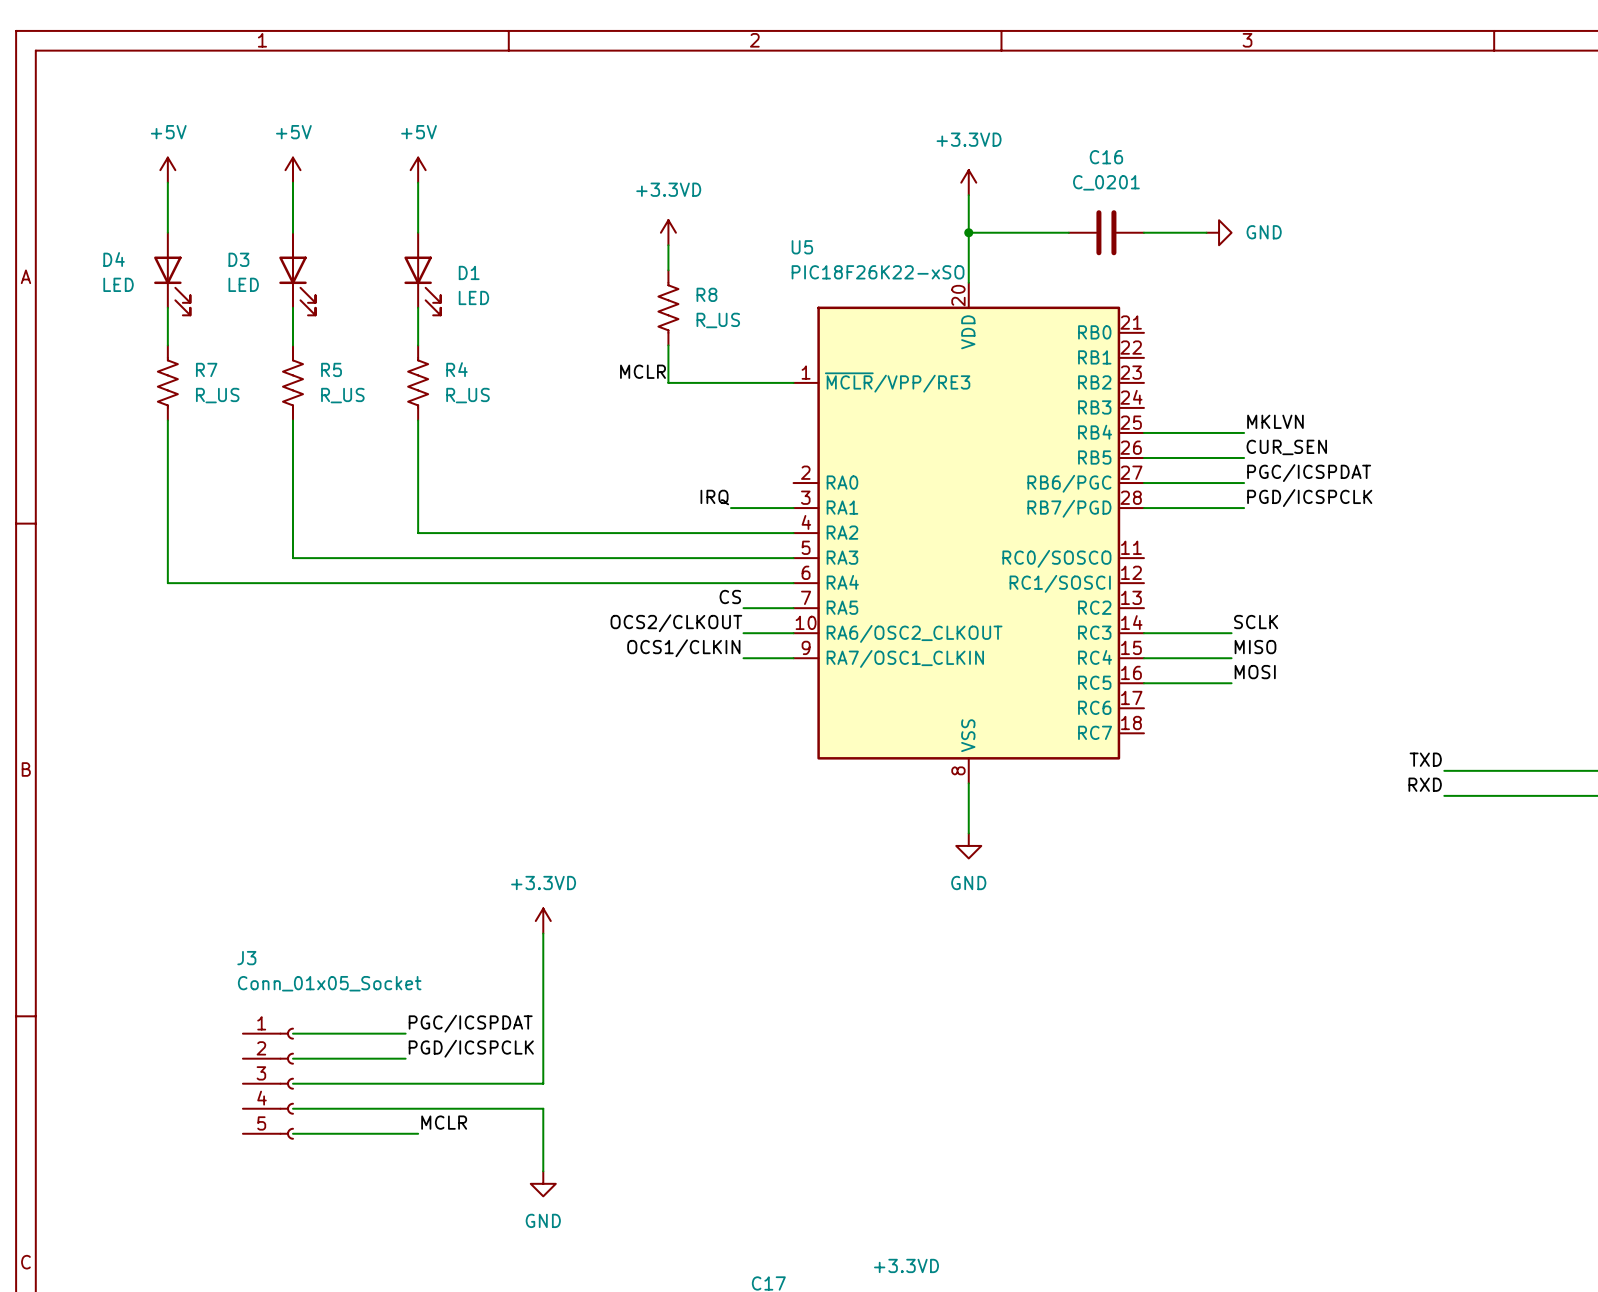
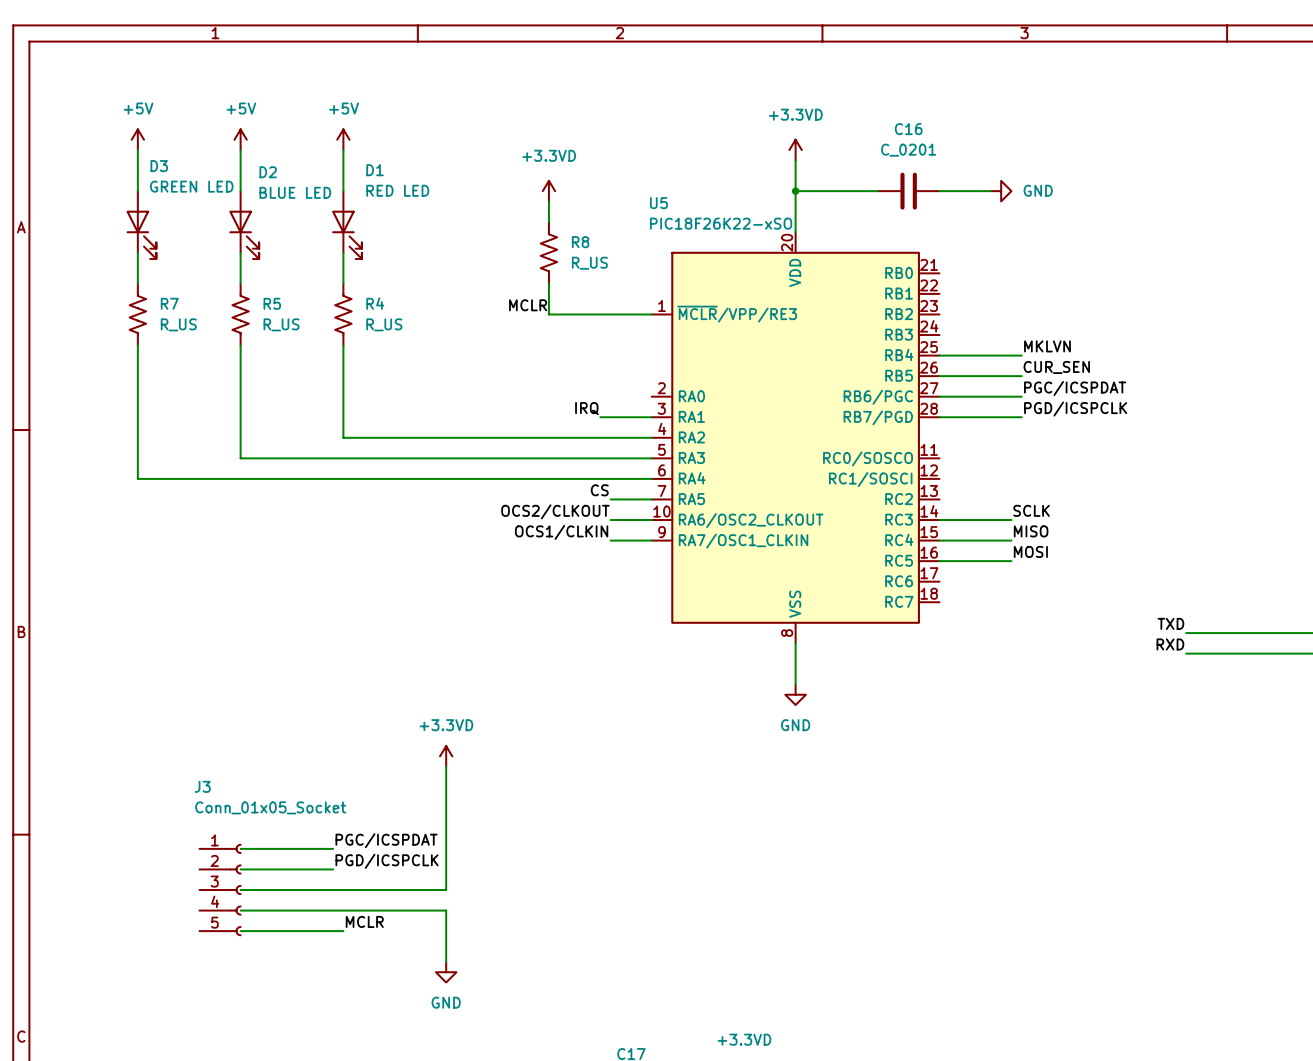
D4 name: D4 (114, 259) -> D3 (159, 166)
D3 name: D3 (238, 259) -> D2 (268, 172)
D1 name position: D1 (469, 272) -> D1 (375, 170)
D4 value: LED (118, 284) -> GREEN LED (191, 186)
D3 value: LED (243, 284) -> BLUE LED (295, 192)
D1 value: LED (473, 297) -> RED LED (397, 190)

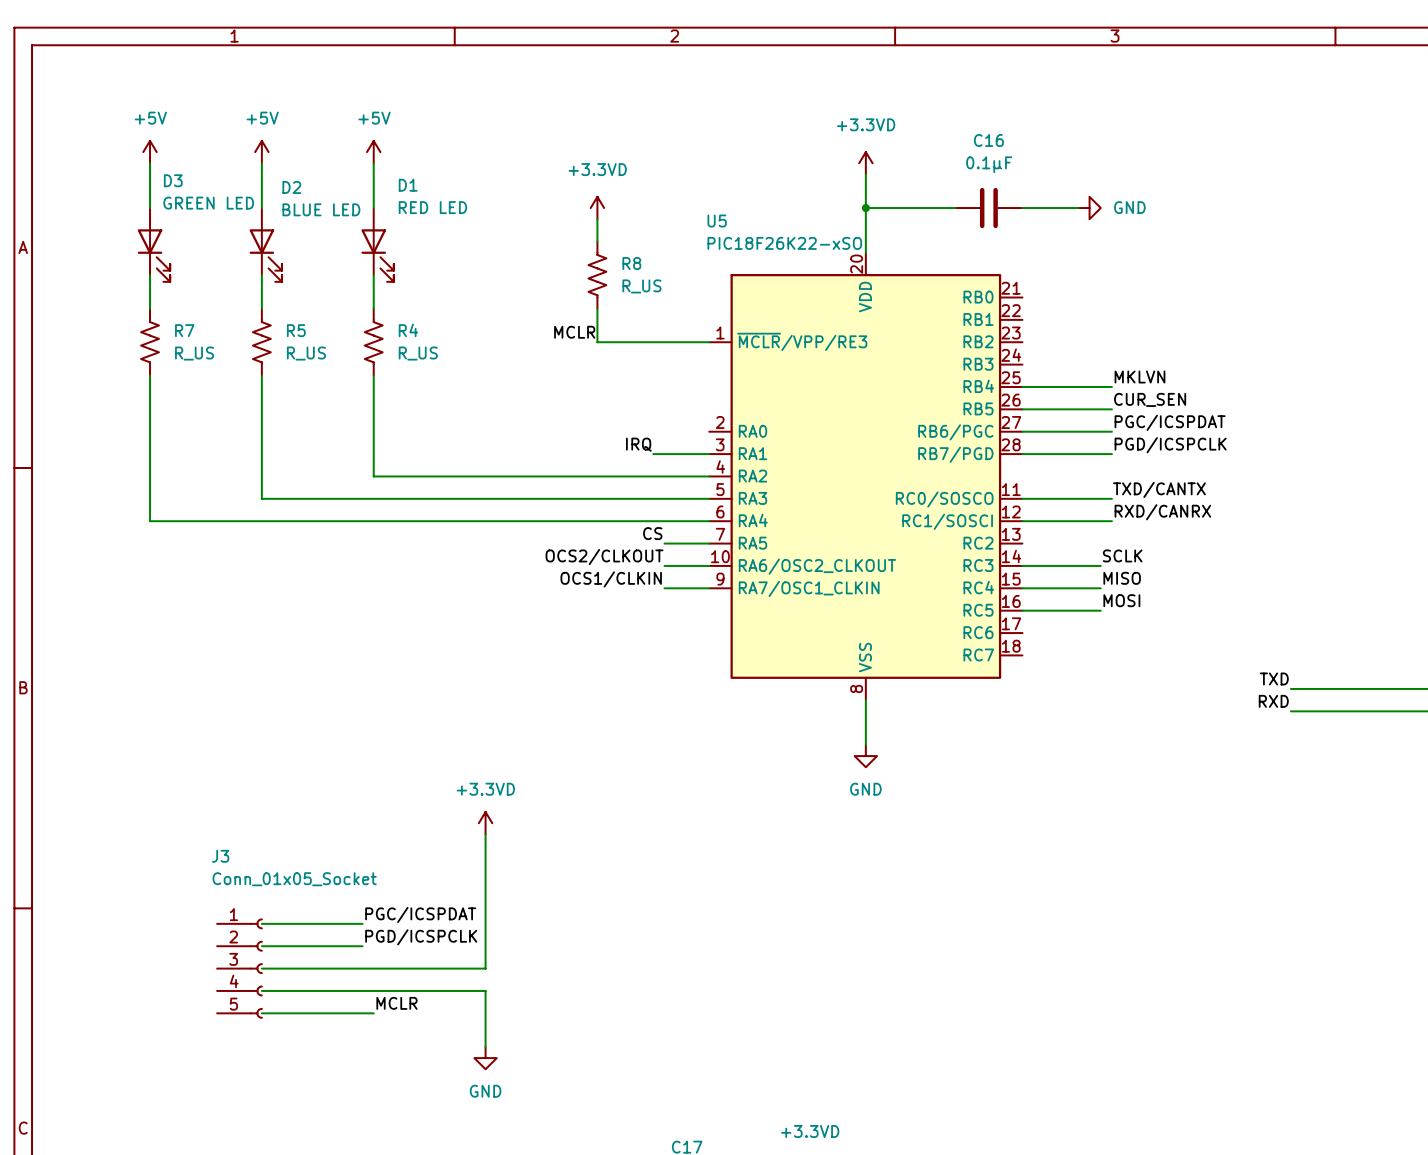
C16 value: C_0201 (908, 150) -> 0.1µF (989, 164)
label: none -> TXD/CANTX (1159, 489)
wire: none -> (1022, 498) (1111, 498)
label: none -> RXD/CANRX (1162, 512)
wire: none -> (1022, 521) (1111, 521)

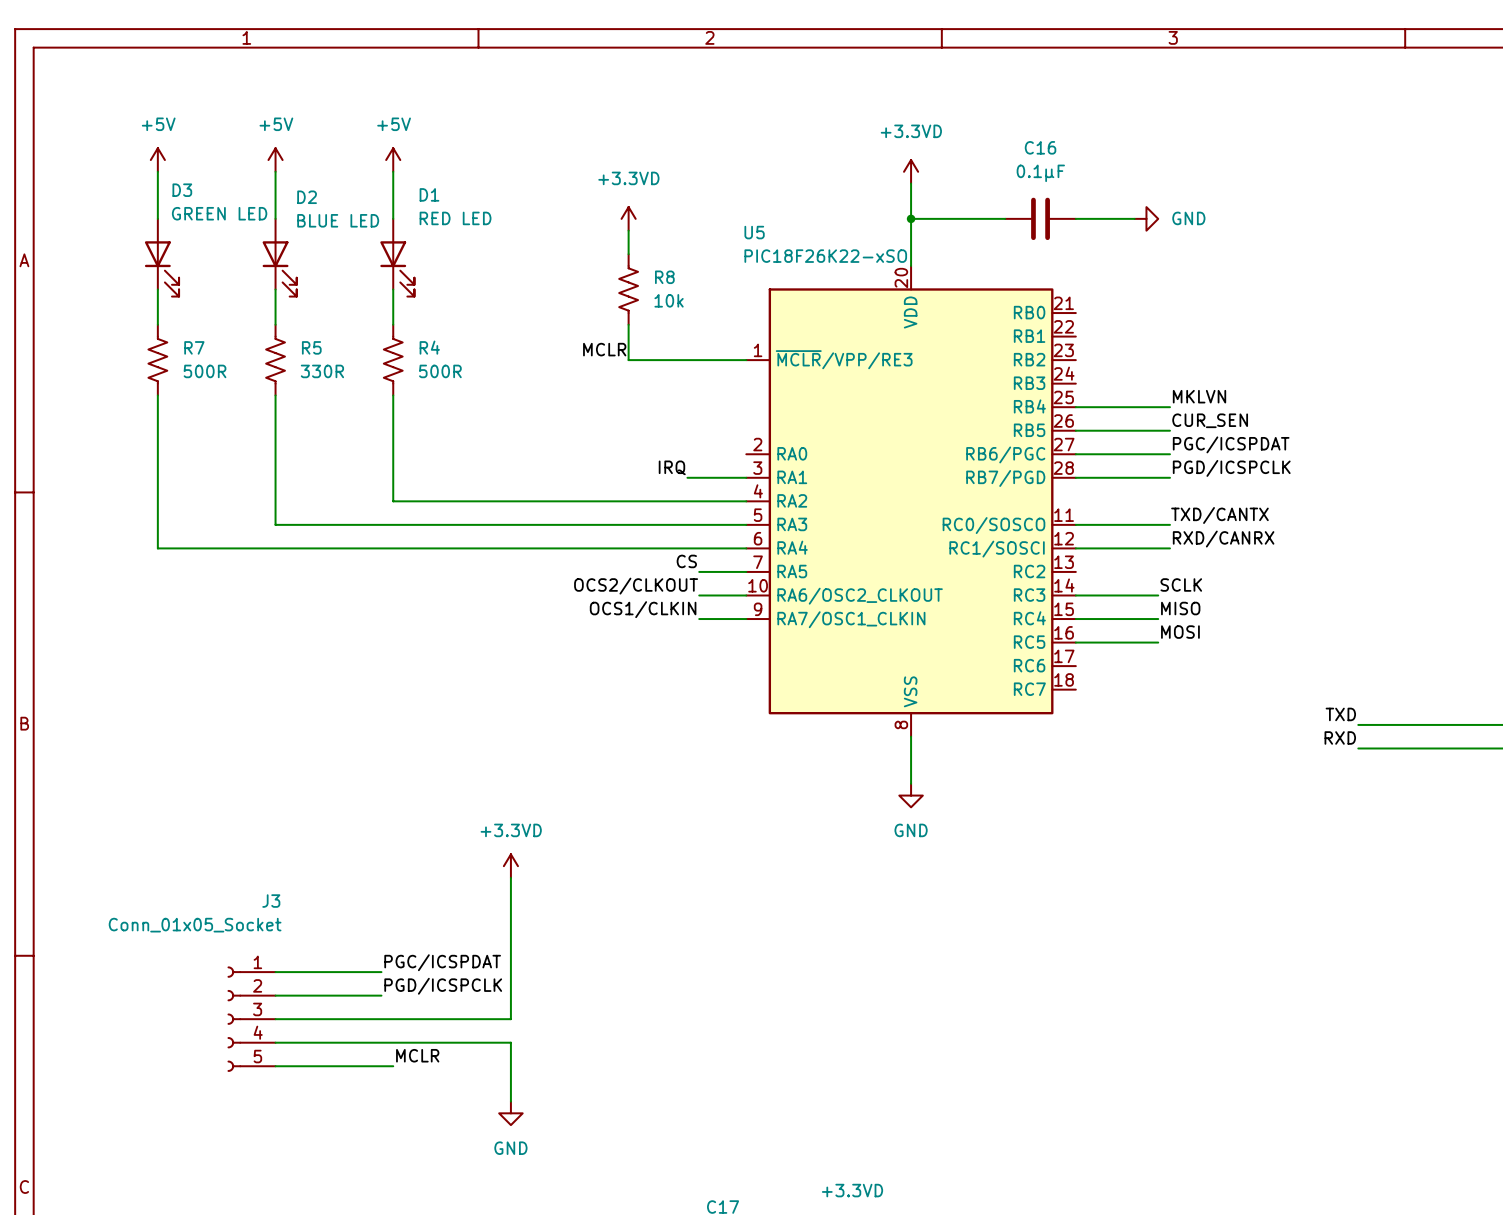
R8 value: R_US (641, 286) -> 10k (669, 300)
R7 value: R_US (194, 353) -> 500R (205, 371)
R5 value: R_US (306, 353) -> 330R (322, 371)
R4 value: R_US (418, 353) -> 500R (440, 371)
J3 flip: as is (256, 968) -> left-right (234, 1019)

